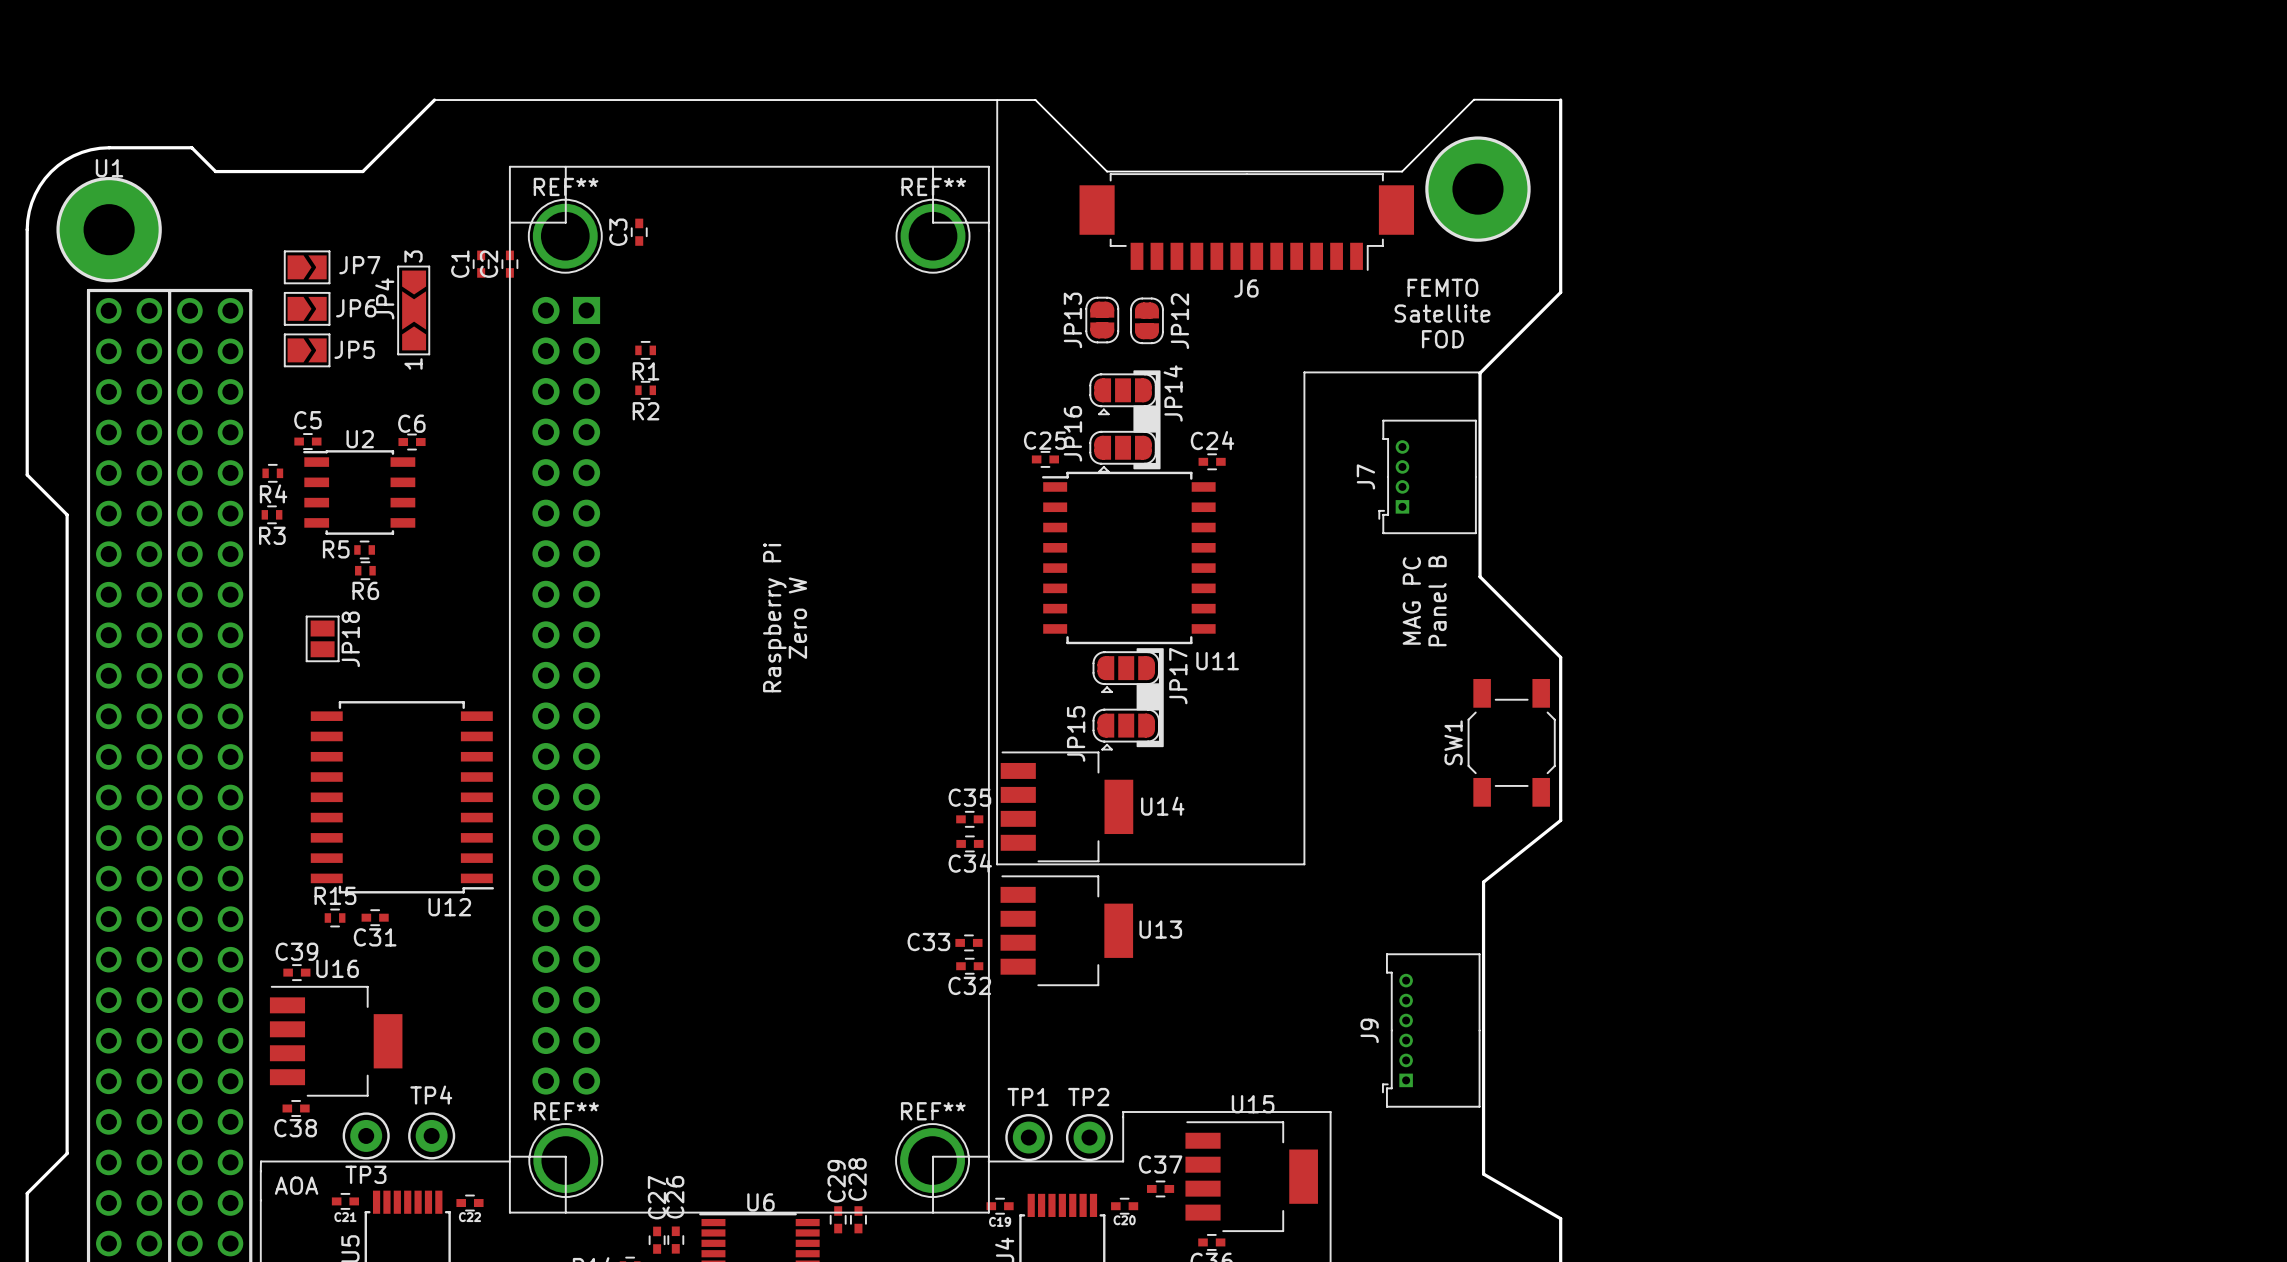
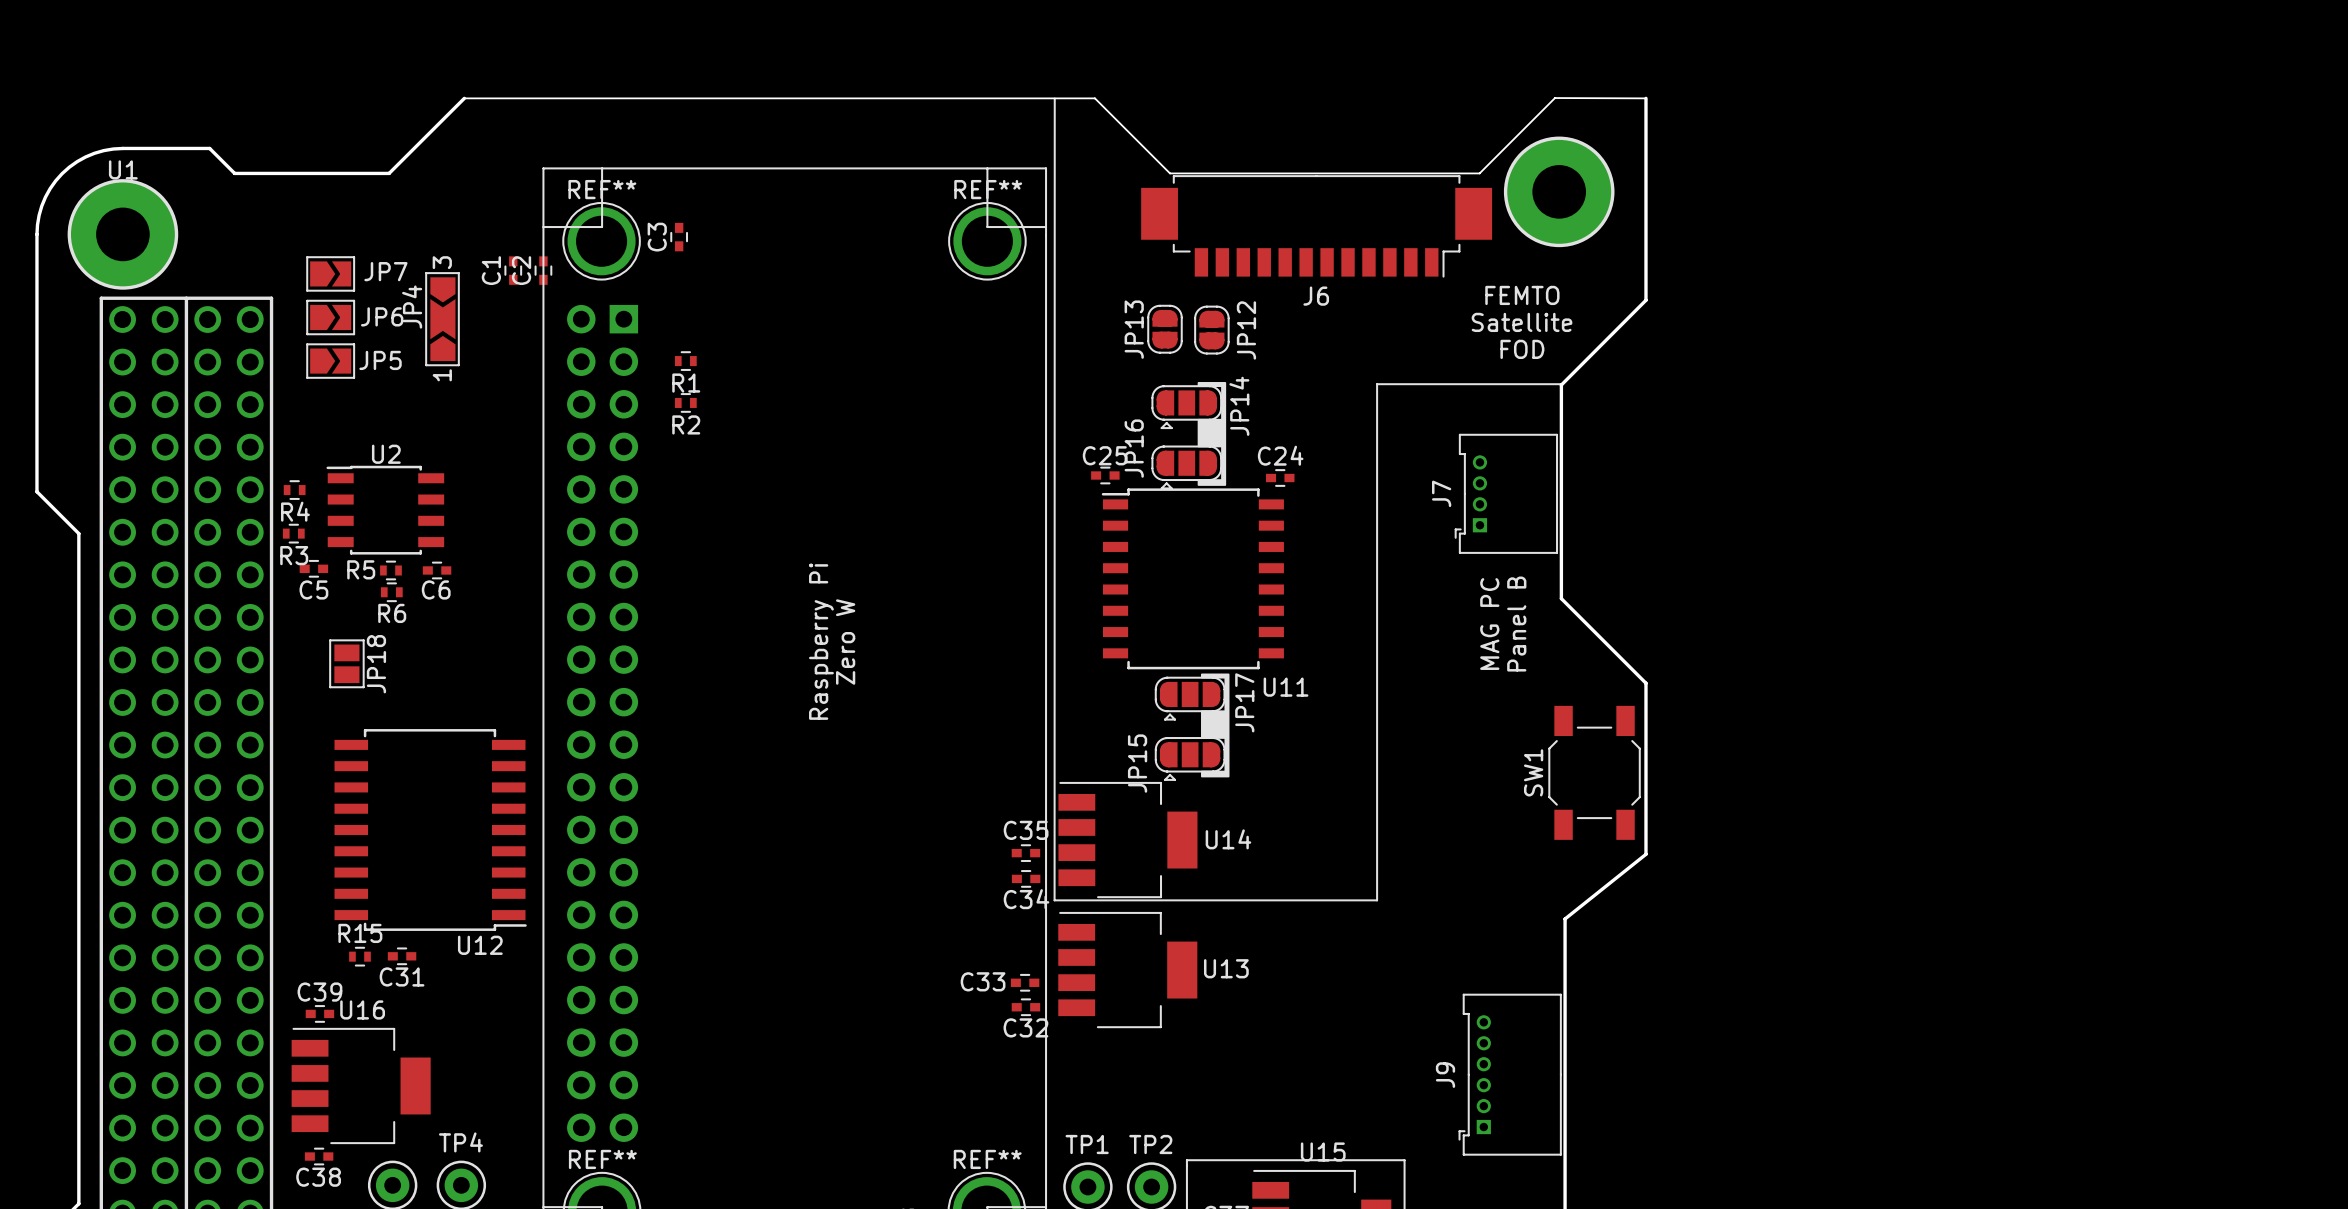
C5 name position: C5 (307, 420) -> C5 (313, 589)
C6 name position: C6 (411, 423) -> C6 (436, 589)
C5 position: (307, 441) -> (313, 568)
C6 position: (412, 442) -> (437, 570)

